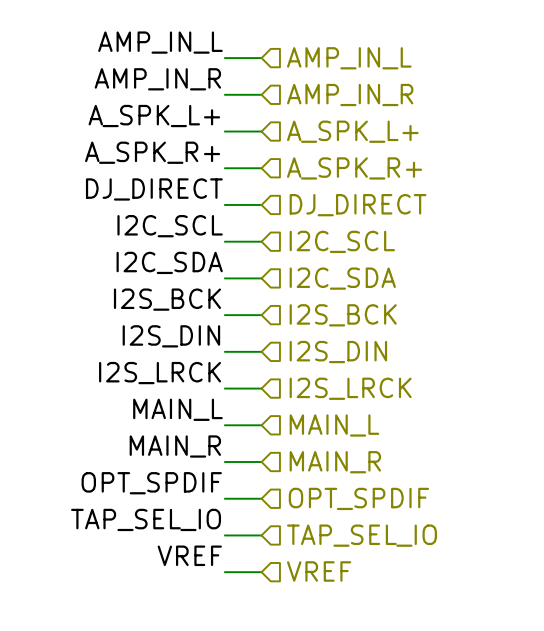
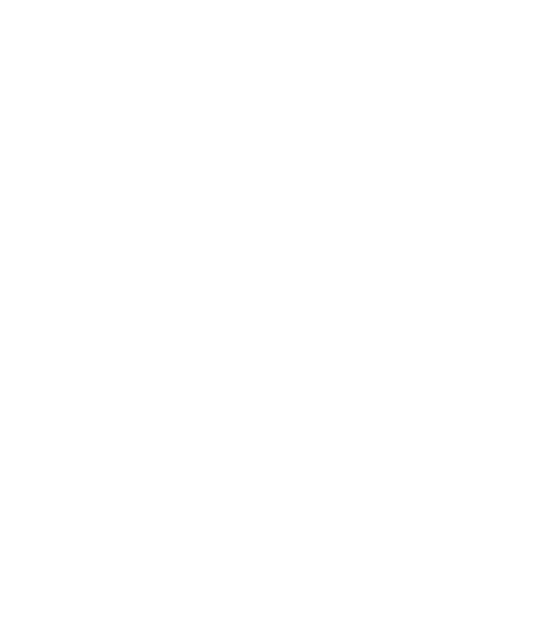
label: AMP_IN_L (160, 42) -> none
wire: (224, 58) (261, 58) -> none
hierarchical label: AMP_IN_L (349, 58) -> none
label: AMP_IN_R (157, 79) -> none
wire: (224, 94) (261, 94) -> none
hierarchical label: AMP_IN_R (350, 94) -> none
label: A_SPK_L+ (154, 116) -> none
wire: (224, 131) (261, 131) -> none
hierarchical label: A_SPK_L+ (352, 131) -> none
label: A_SPK_R+ (152, 152) -> none
wire: (224, 168) (261, 168) -> none
hierarchical label: A_SPK_R+ (354, 168) -> none
label: DJ_DIRECT (154, 189) -> none
wire: (224, 204) (261, 204) -> none
hierarchical label: DJ_DIRECT (358, 205) -> none
label: I2C_SCL (170, 226) -> none
wire: (224, 241) (261, 241) -> none
hierarchical label: I2C_SCL (342, 241) -> none
label: I2C_SDA (169, 262) -> none
wire: (224, 278) (261, 278) -> none
hierarchical label: I2C_SDA (342, 278) -> none
label: I2S_BCK (167, 299) -> none
wire: (224, 315) (261, 315) -> none
hierarchical label: I2S_BCK (343, 315) -> none
label: I2S_DIN (171, 336) -> none
wire: (224, 351) (261, 351) -> none
hierarchical label: I2S_DIN (338, 352) -> none
label: I2S_LRCK (160, 373) -> none
wire: (224, 388) (261, 388) -> none
hierarchical label: I2S_LRCK (350, 388) -> none
label: MAIN_L (177, 409) -> none
wire: (224, 425) (261, 425) -> none
hierarchical label: MAIN_L (334, 425) -> none
label: MAIN_R (175, 446) -> none
wire: (224, 462) (261, 462) -> none
hierarchical label: MAIN_R (335, 462) -> none
label: OPT_SPDIF (151, 483) -> none
wire: (224, 498) (261, 498) -> none
hierarchical label: OPT_SPDIF (358, 498) -> none
label: TAP_SEL_IO (146, 519) -> none
wire: (224, 535) (261, 535) -> none
hierarchical label: TAP_SEL_IO (361, 535) -> none
label: VREF (189, 555) -> none
hierarchical label: VREF (319, 571) -> none
wire: (224, 572) (261, 572) -> none

